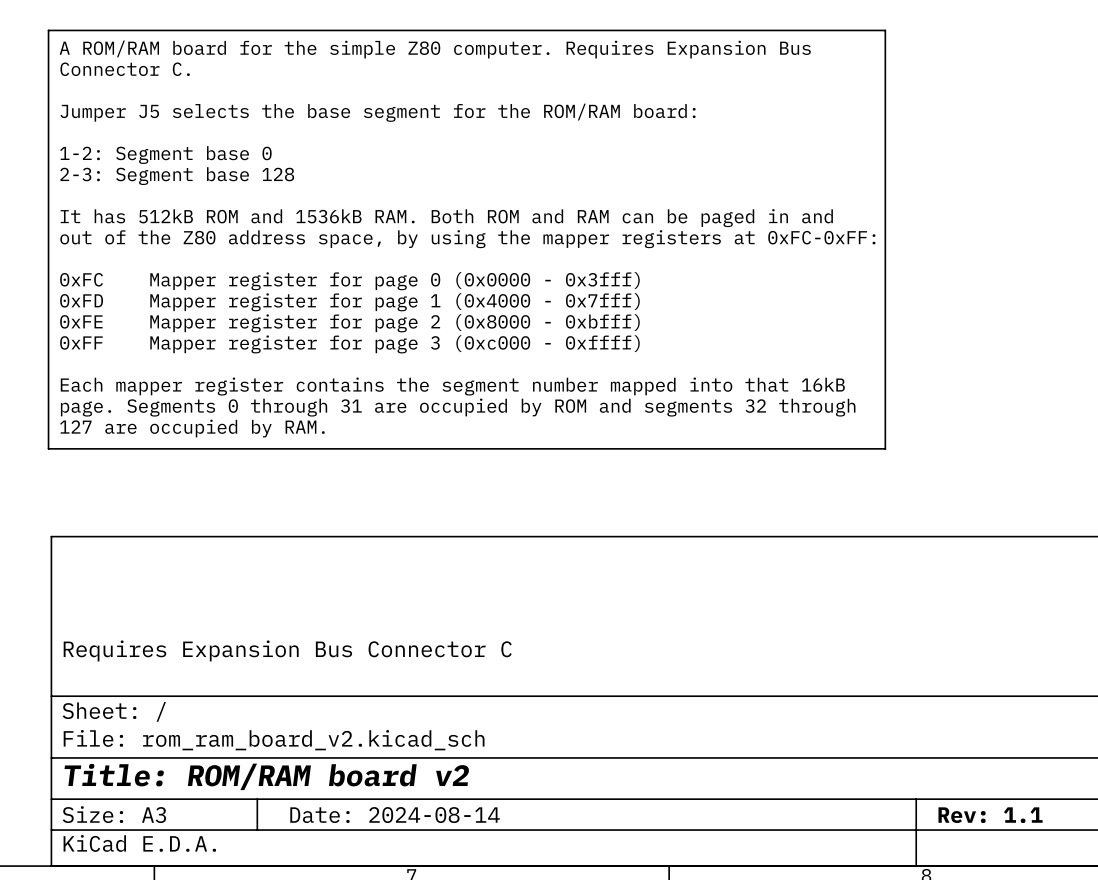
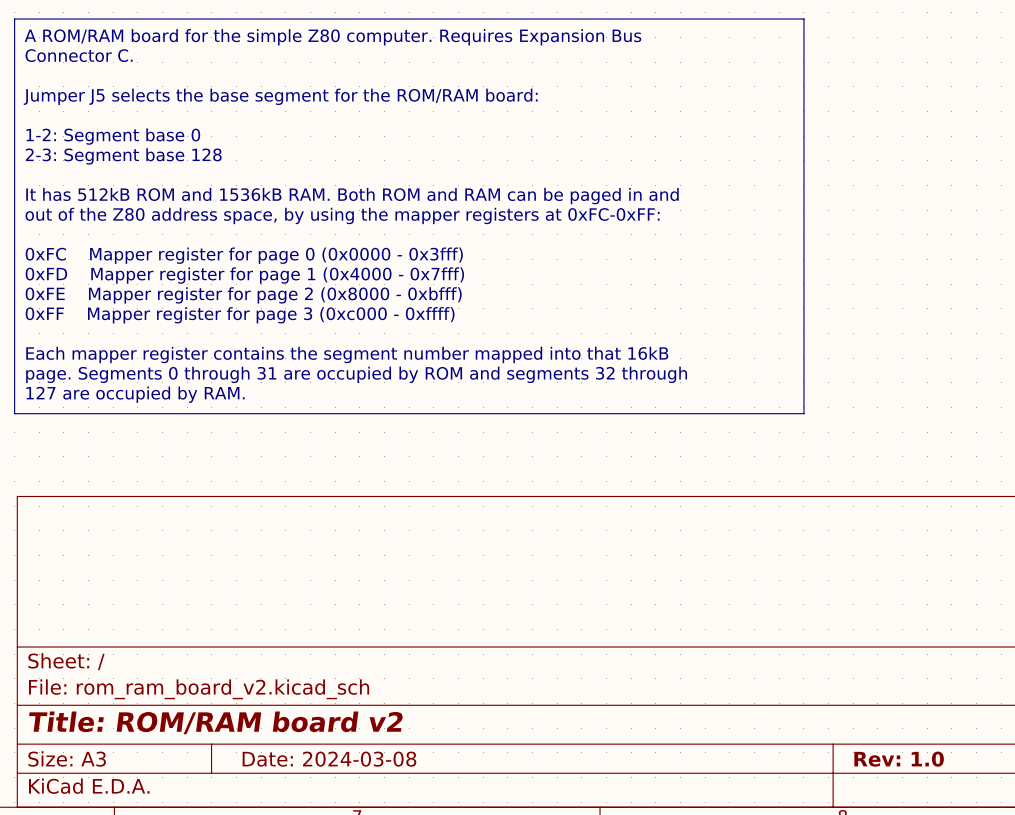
title block: Requires Expansion Bus Connector C (287, 650) -> none
title block: Date: 2024-08-14 (395, 815) -> Date: 2024-03-08 (329, 759)
title block: Rev: 1.1 (990, 815) -> Rev: 1.0 (899, 759)

